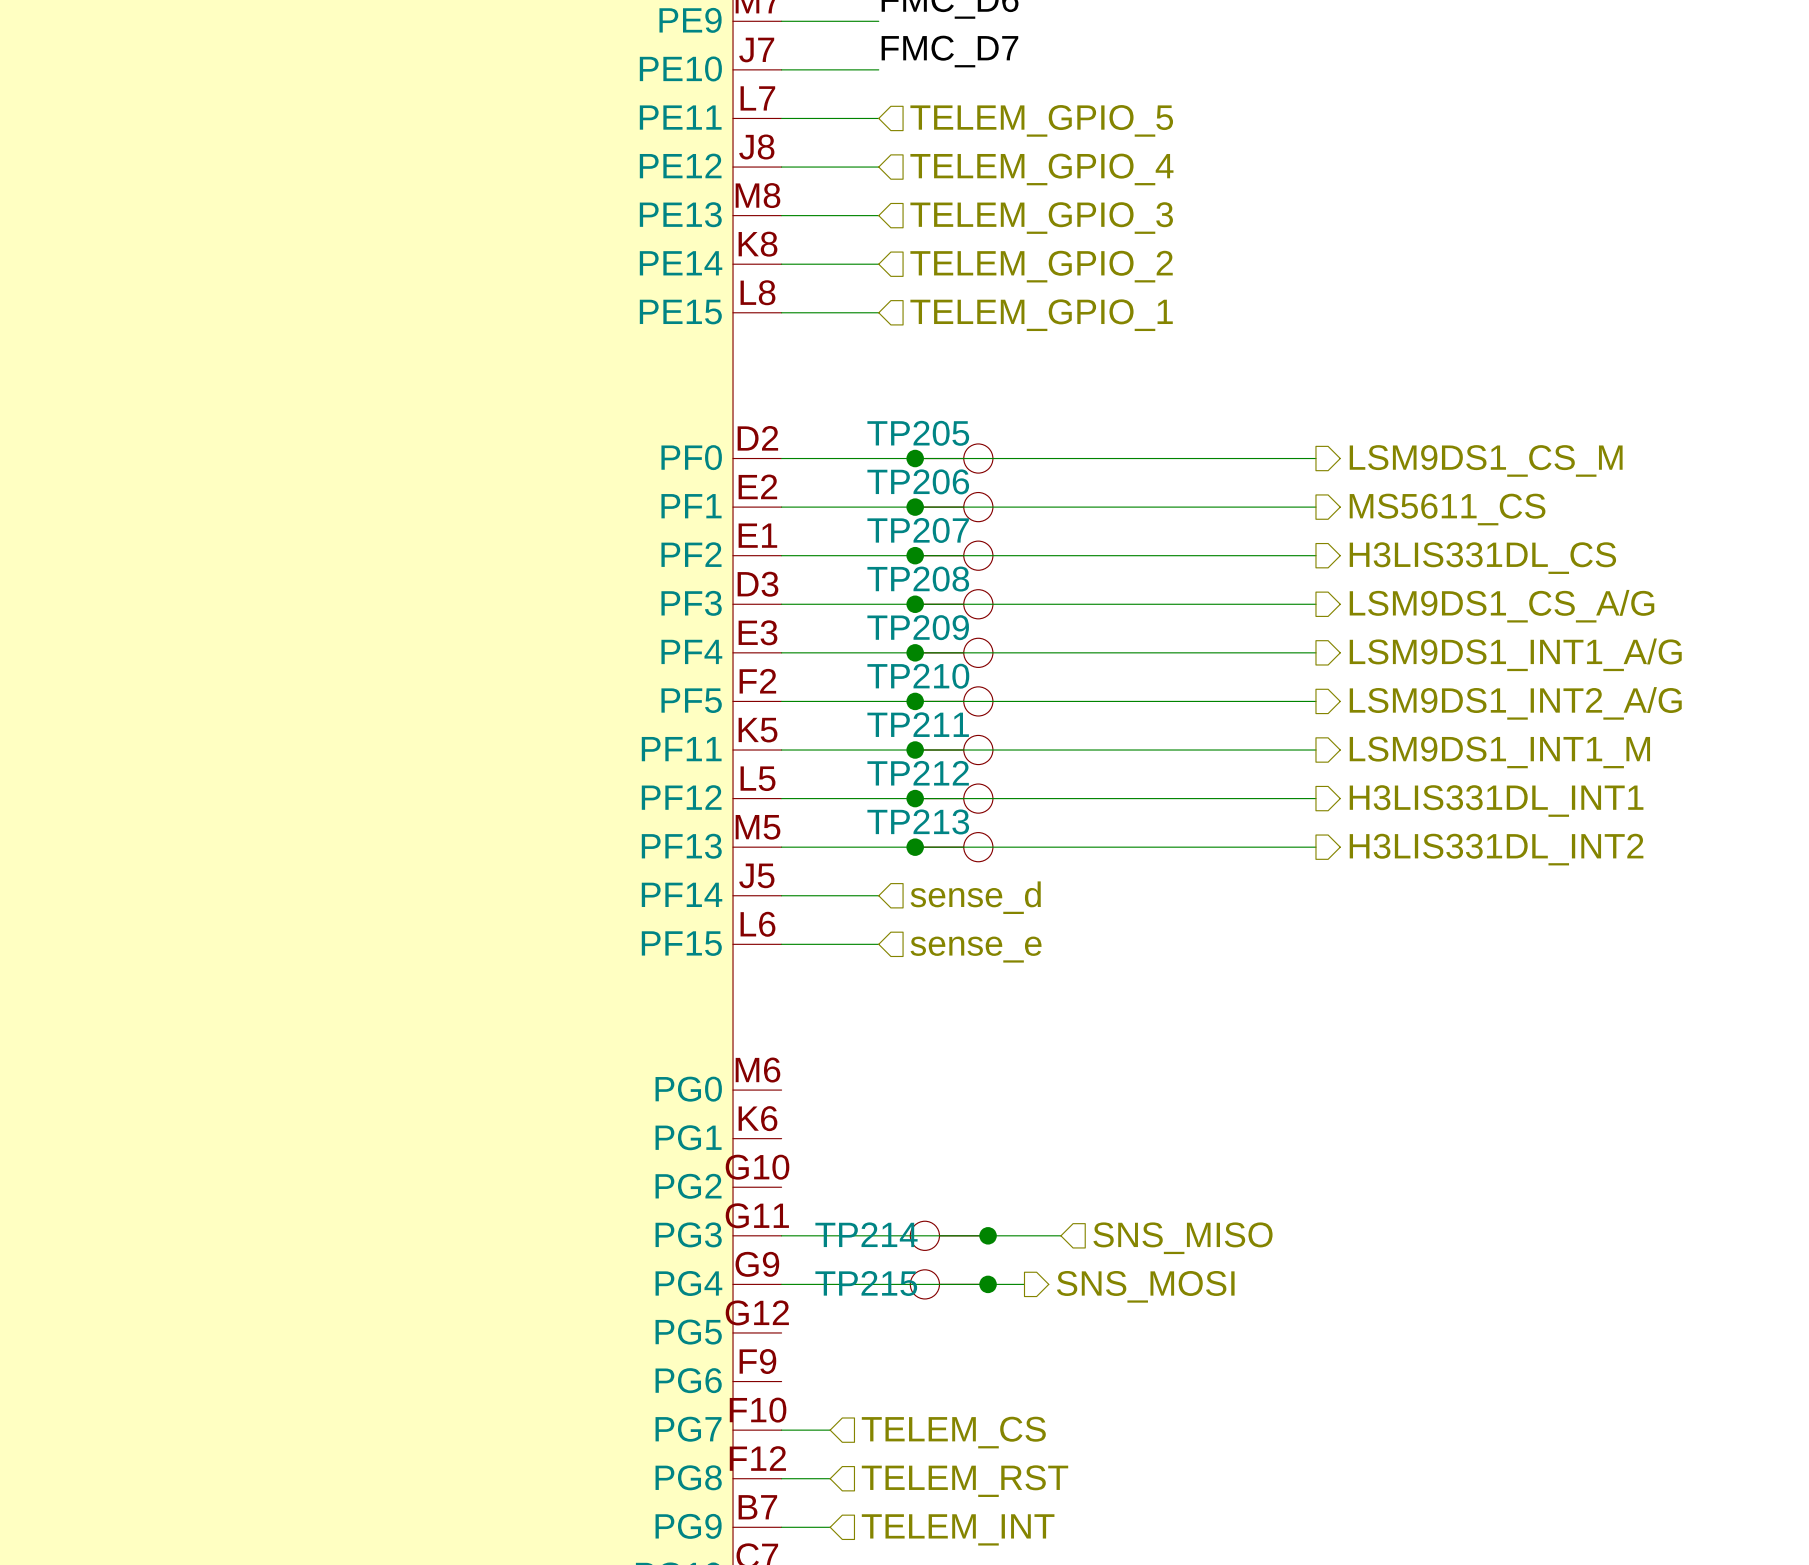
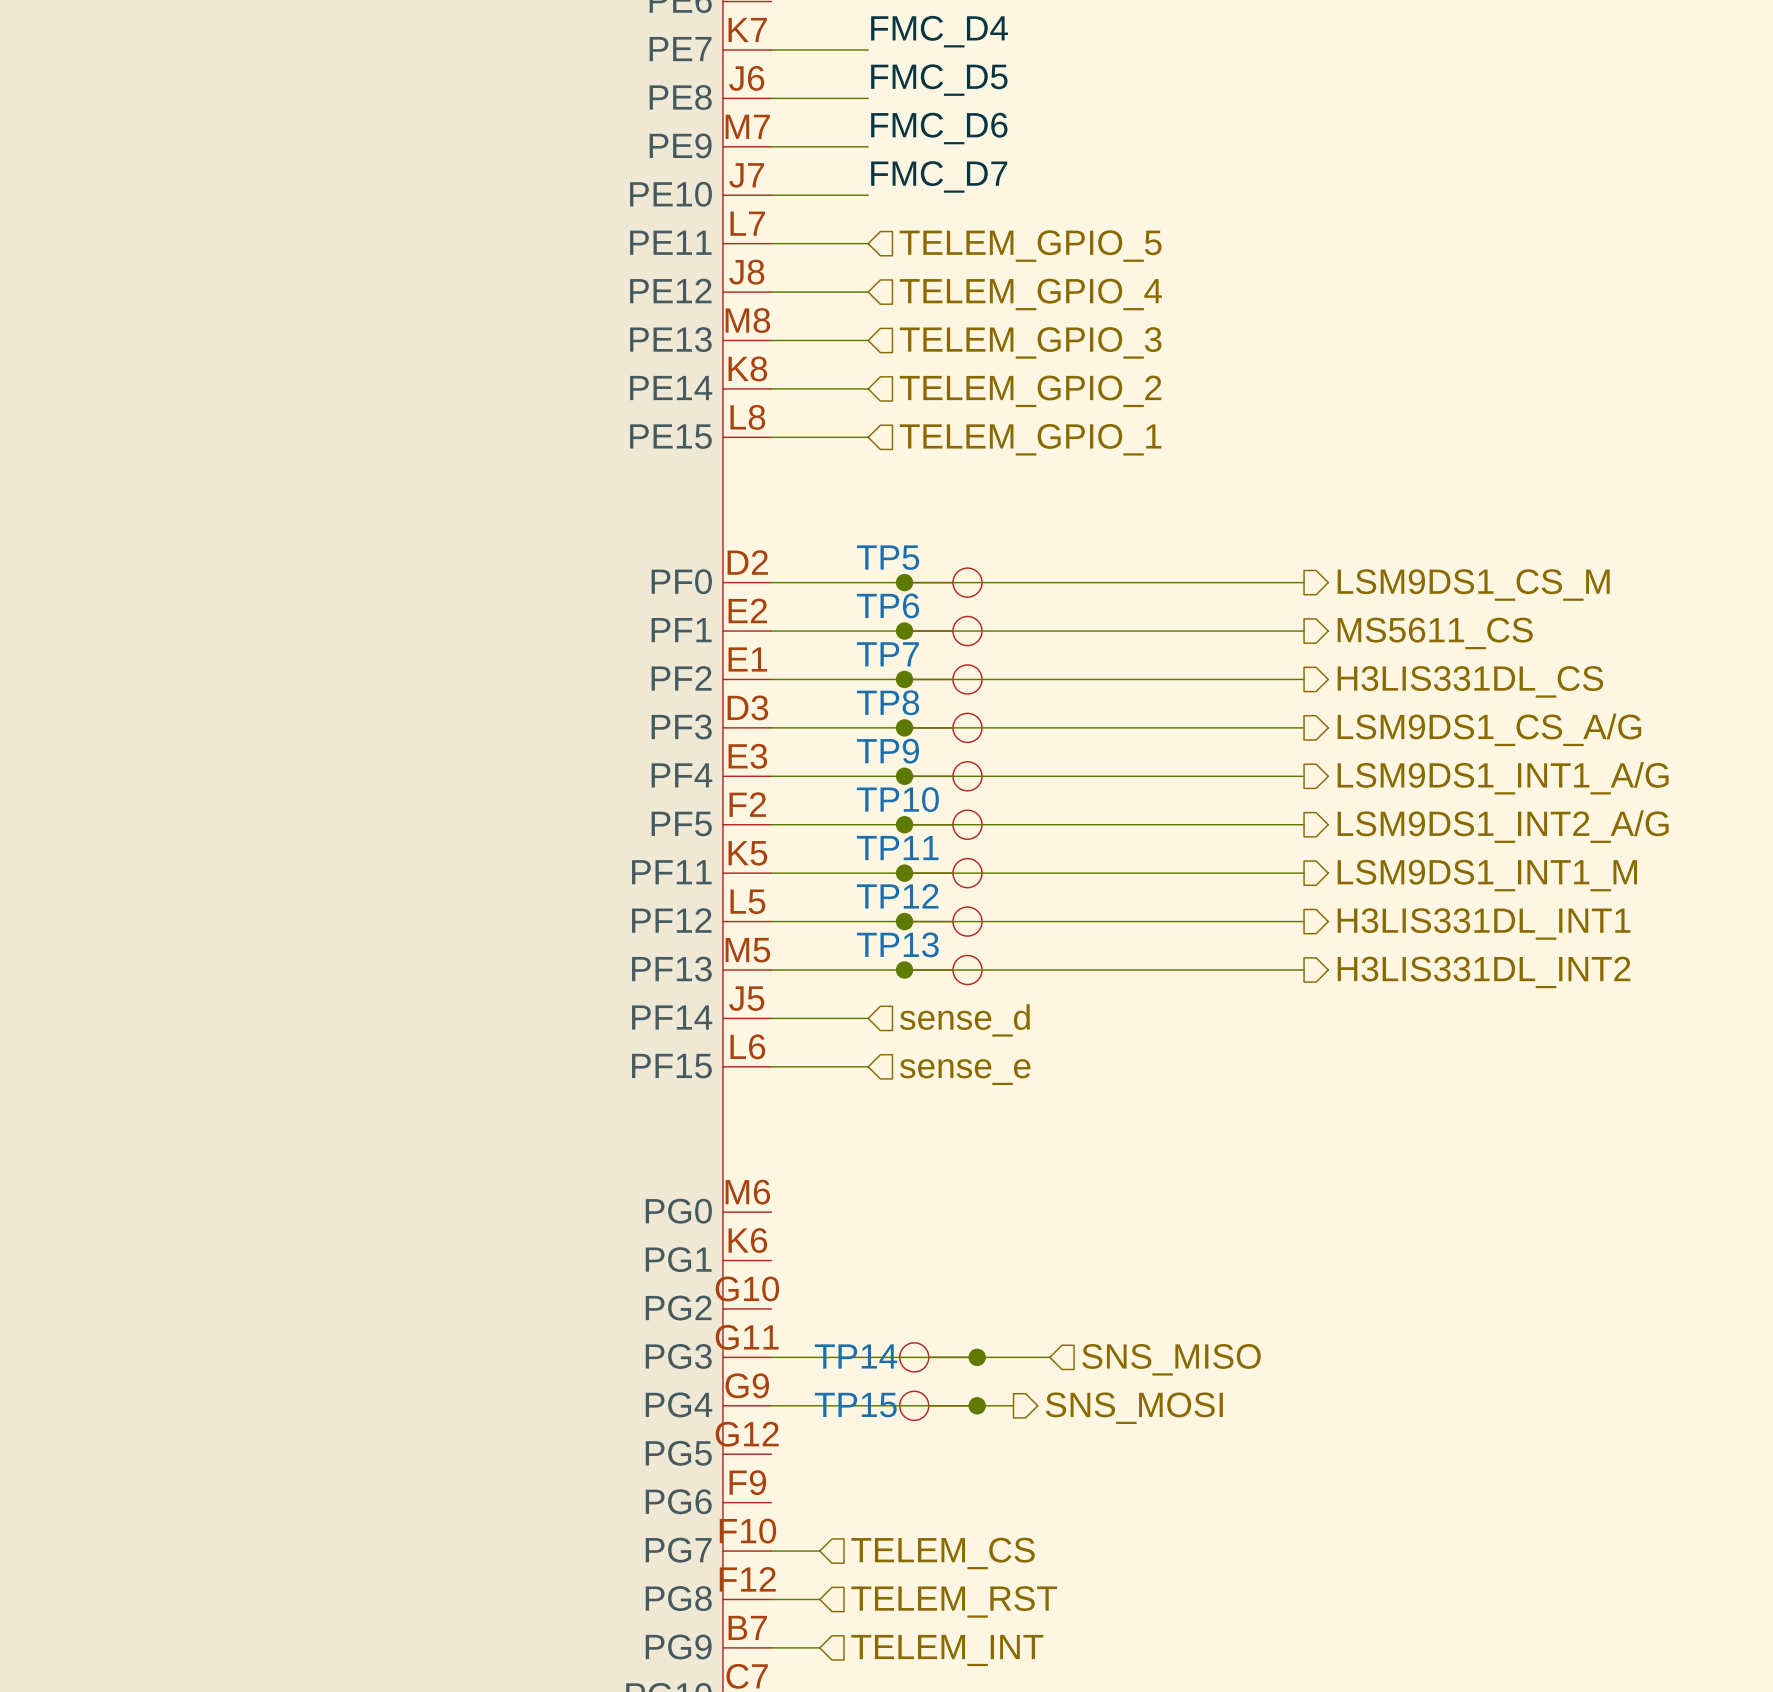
TP205 name: TP205 (918, 433) -> TP5 (888, 557)
TP206 name: TP206 (918, 481) -> TP6 (888, 605)
TP207 name: TP207 (918, 530) -> TP7 (887, 654)
TP208 name: TP208 (918, 579) -> TP8 (888, 702)
TP209 name: TP209 (918, 627) -> TP9 (887, 751)
TP210 name: TP210 (918, 676) -> TP10 (897, 799)
TP211 name: TP211 (918, 724) -> TP11 (897, 848)
TP212 name: TP212 (918, 773) -> TP12 (897, 896)
TP213 name: TP213 (918, 821) -> TP13 (897, 944)
TP214 name: TP214 (866, 1234) -> TP14 (856, 1356)
TP215 name: TP215 (866, 1283) -> TP15 (855, 1405)

